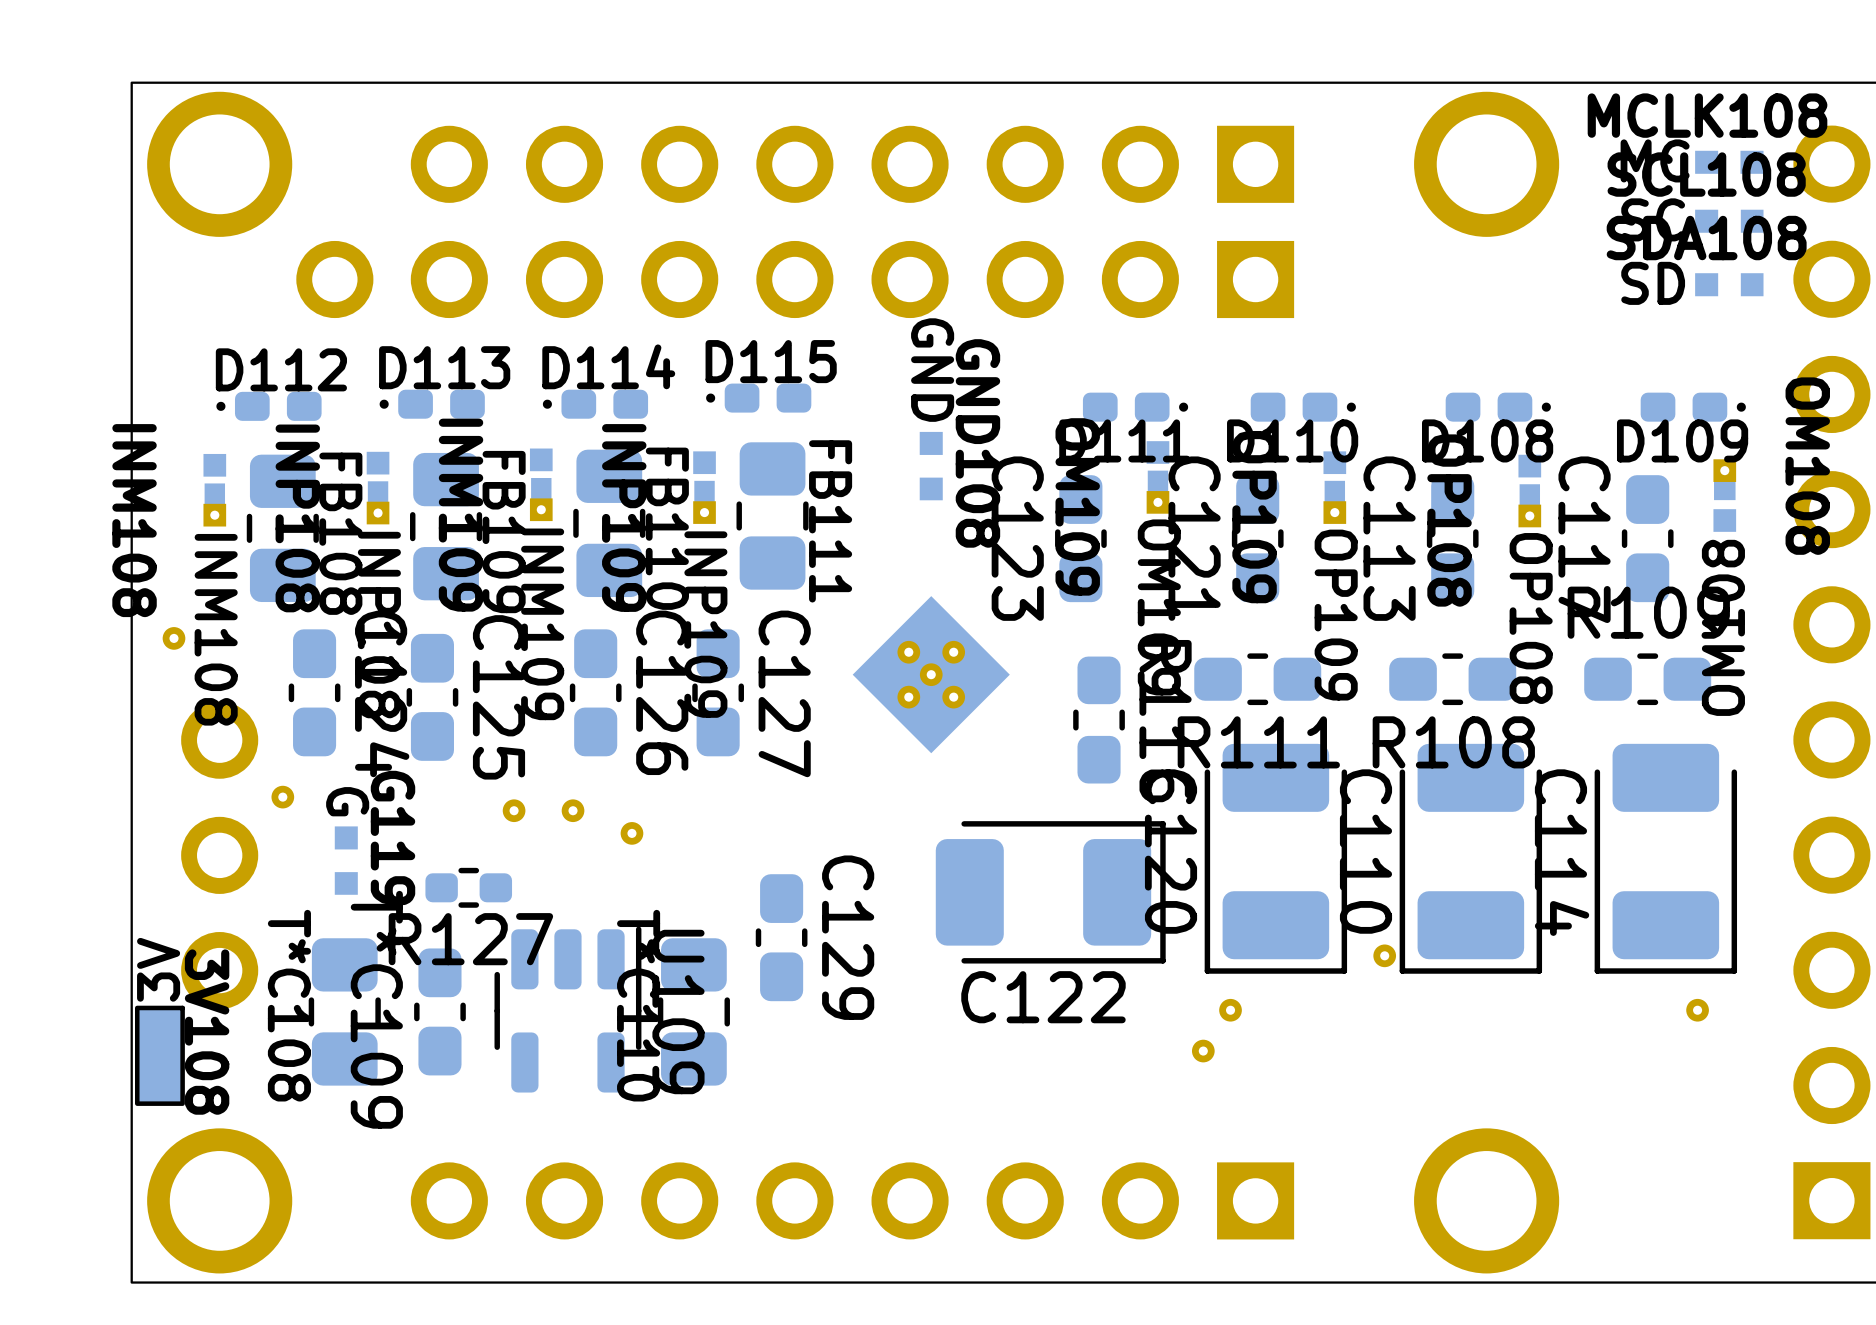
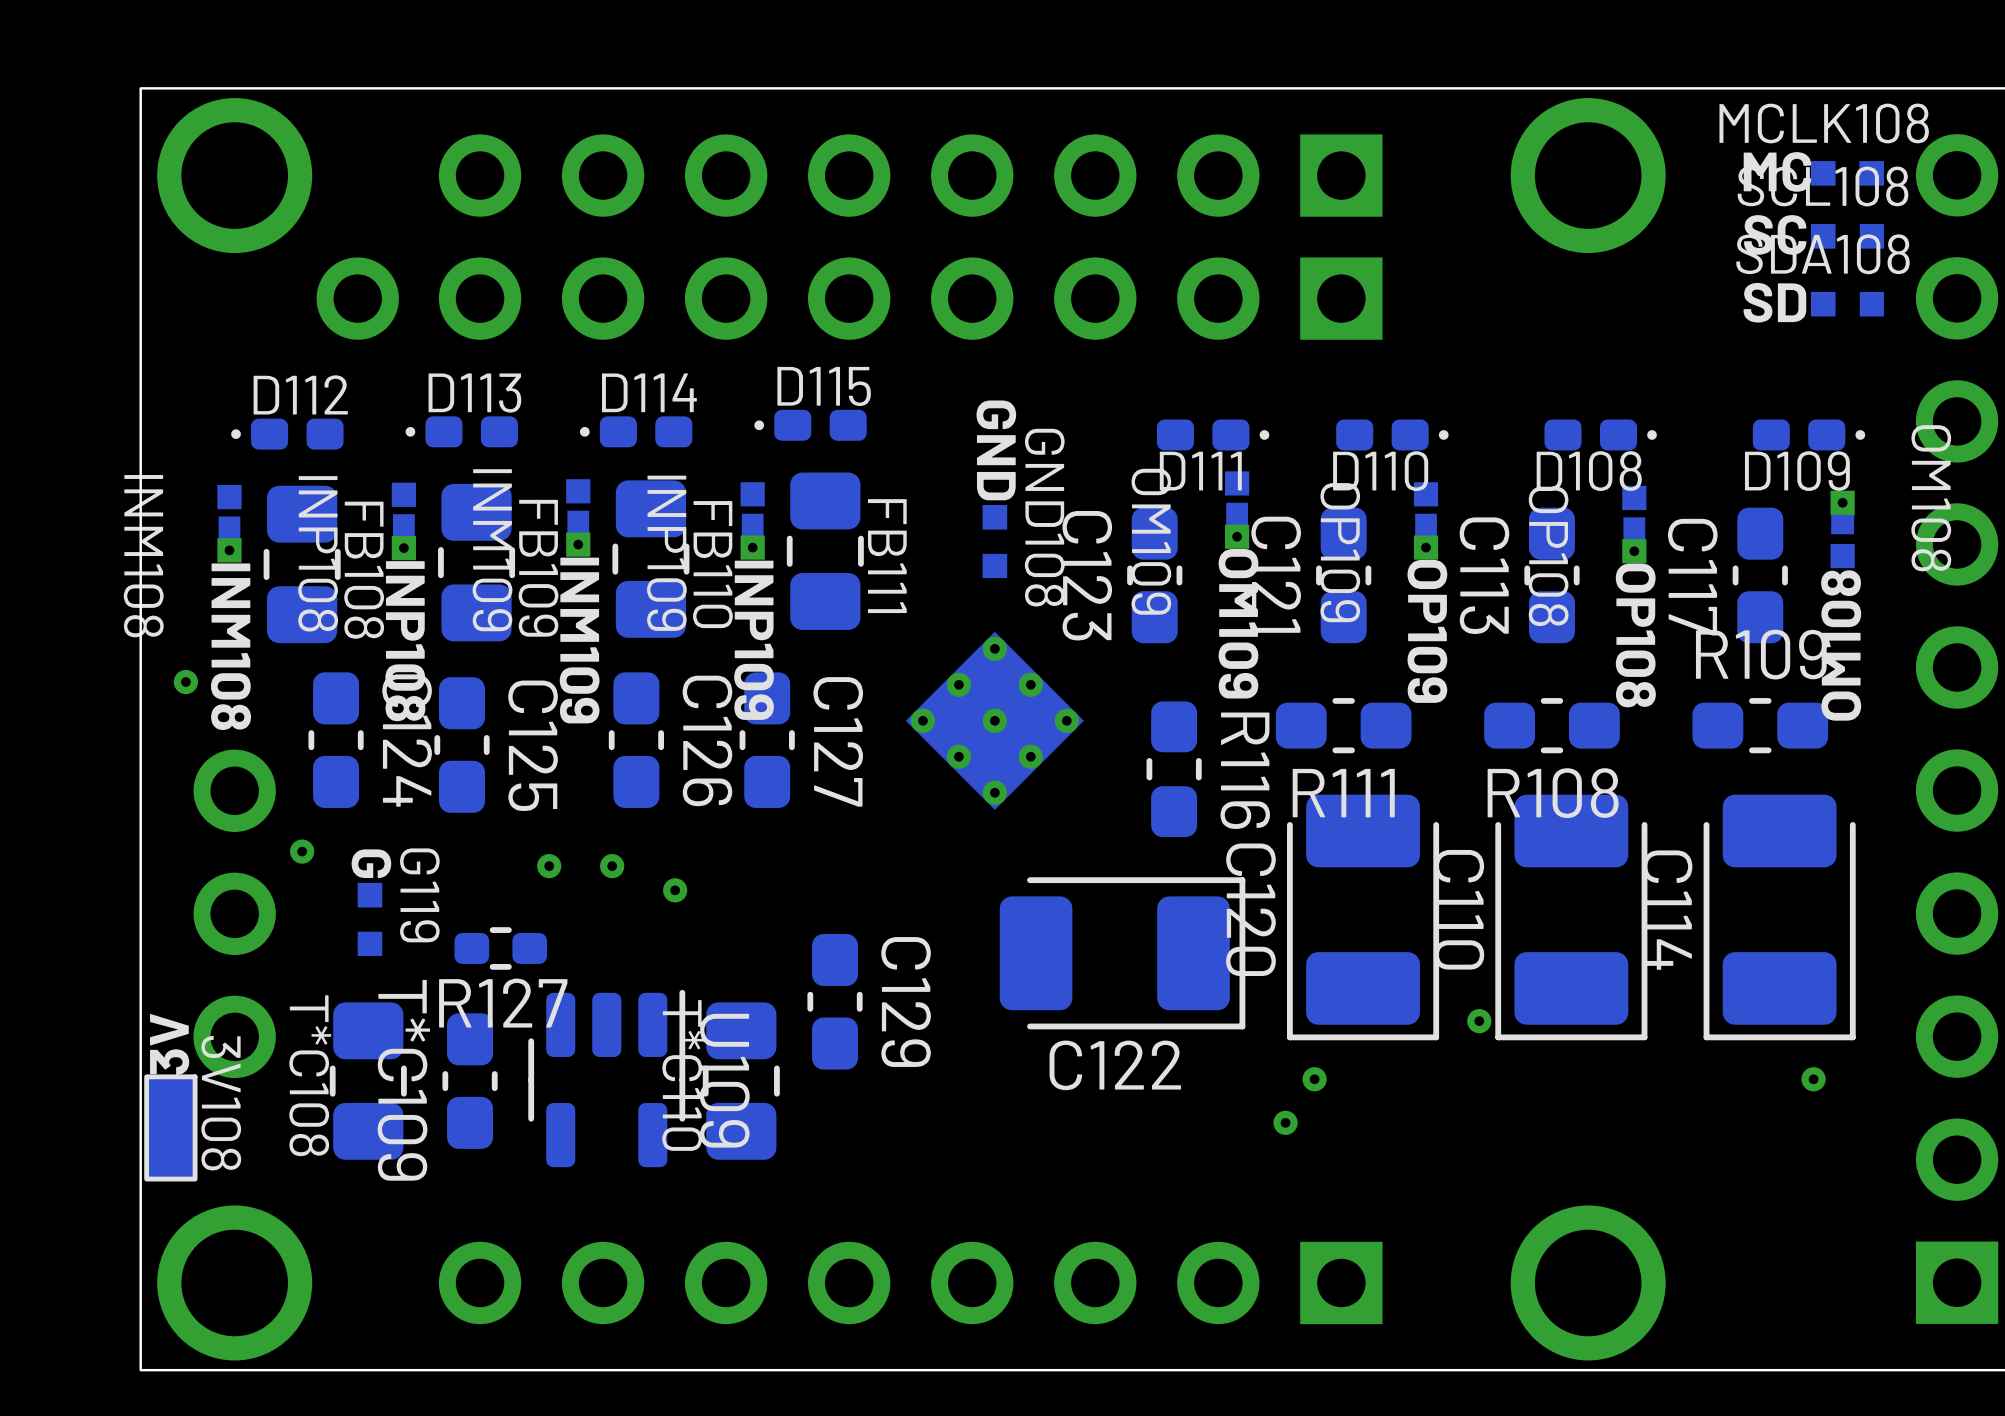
GND108 position: (931, 466) -> (994, 541)
part footprint: [852, 596, 1010, 754] -> [905, 631, 1084, 810]

